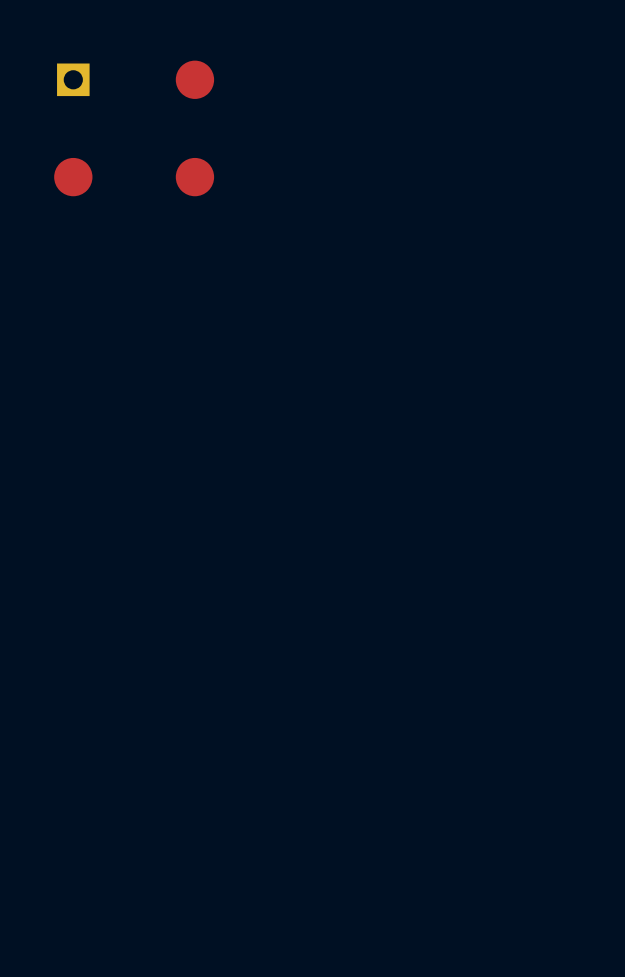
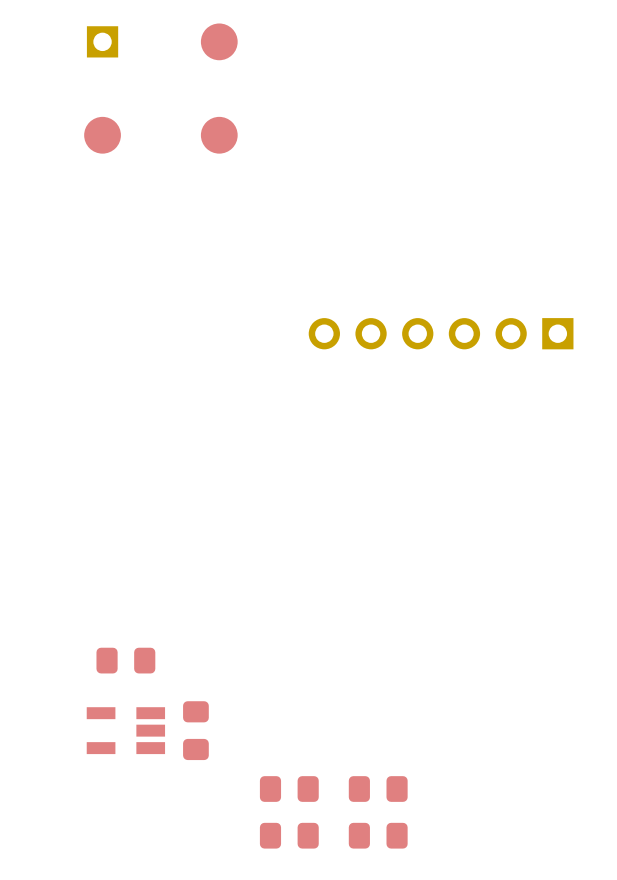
part: none -> (441, 333)
part: none -> (125, 660)
part: none -> (125, 730)
part: none -> (195, 730)
part: none -> (289, 789)
part: none -> (378, 789)
part: none -> (289, 835)
part: none -> (378, 835)

